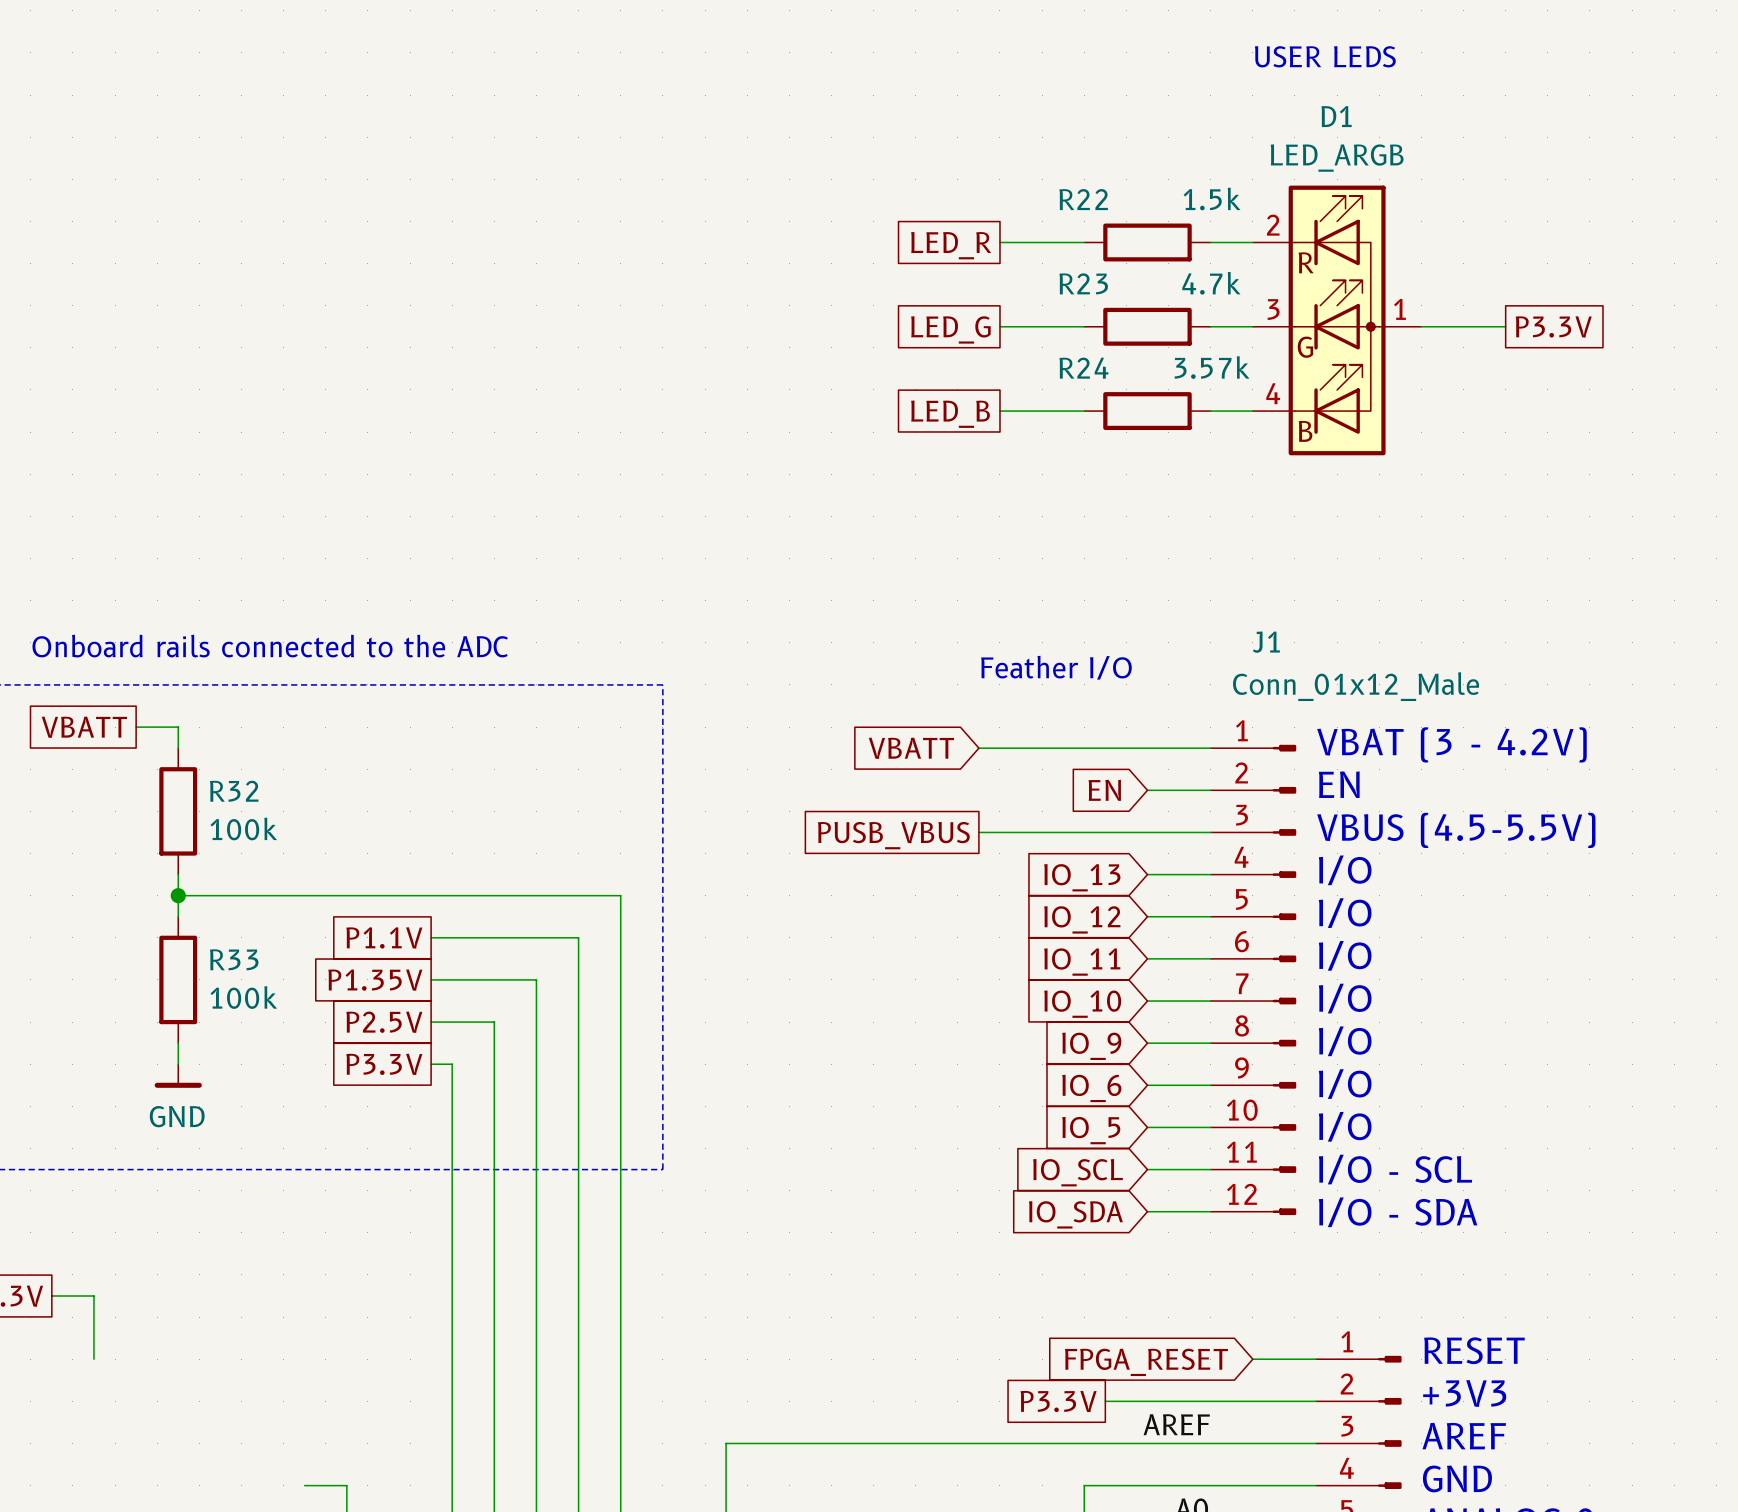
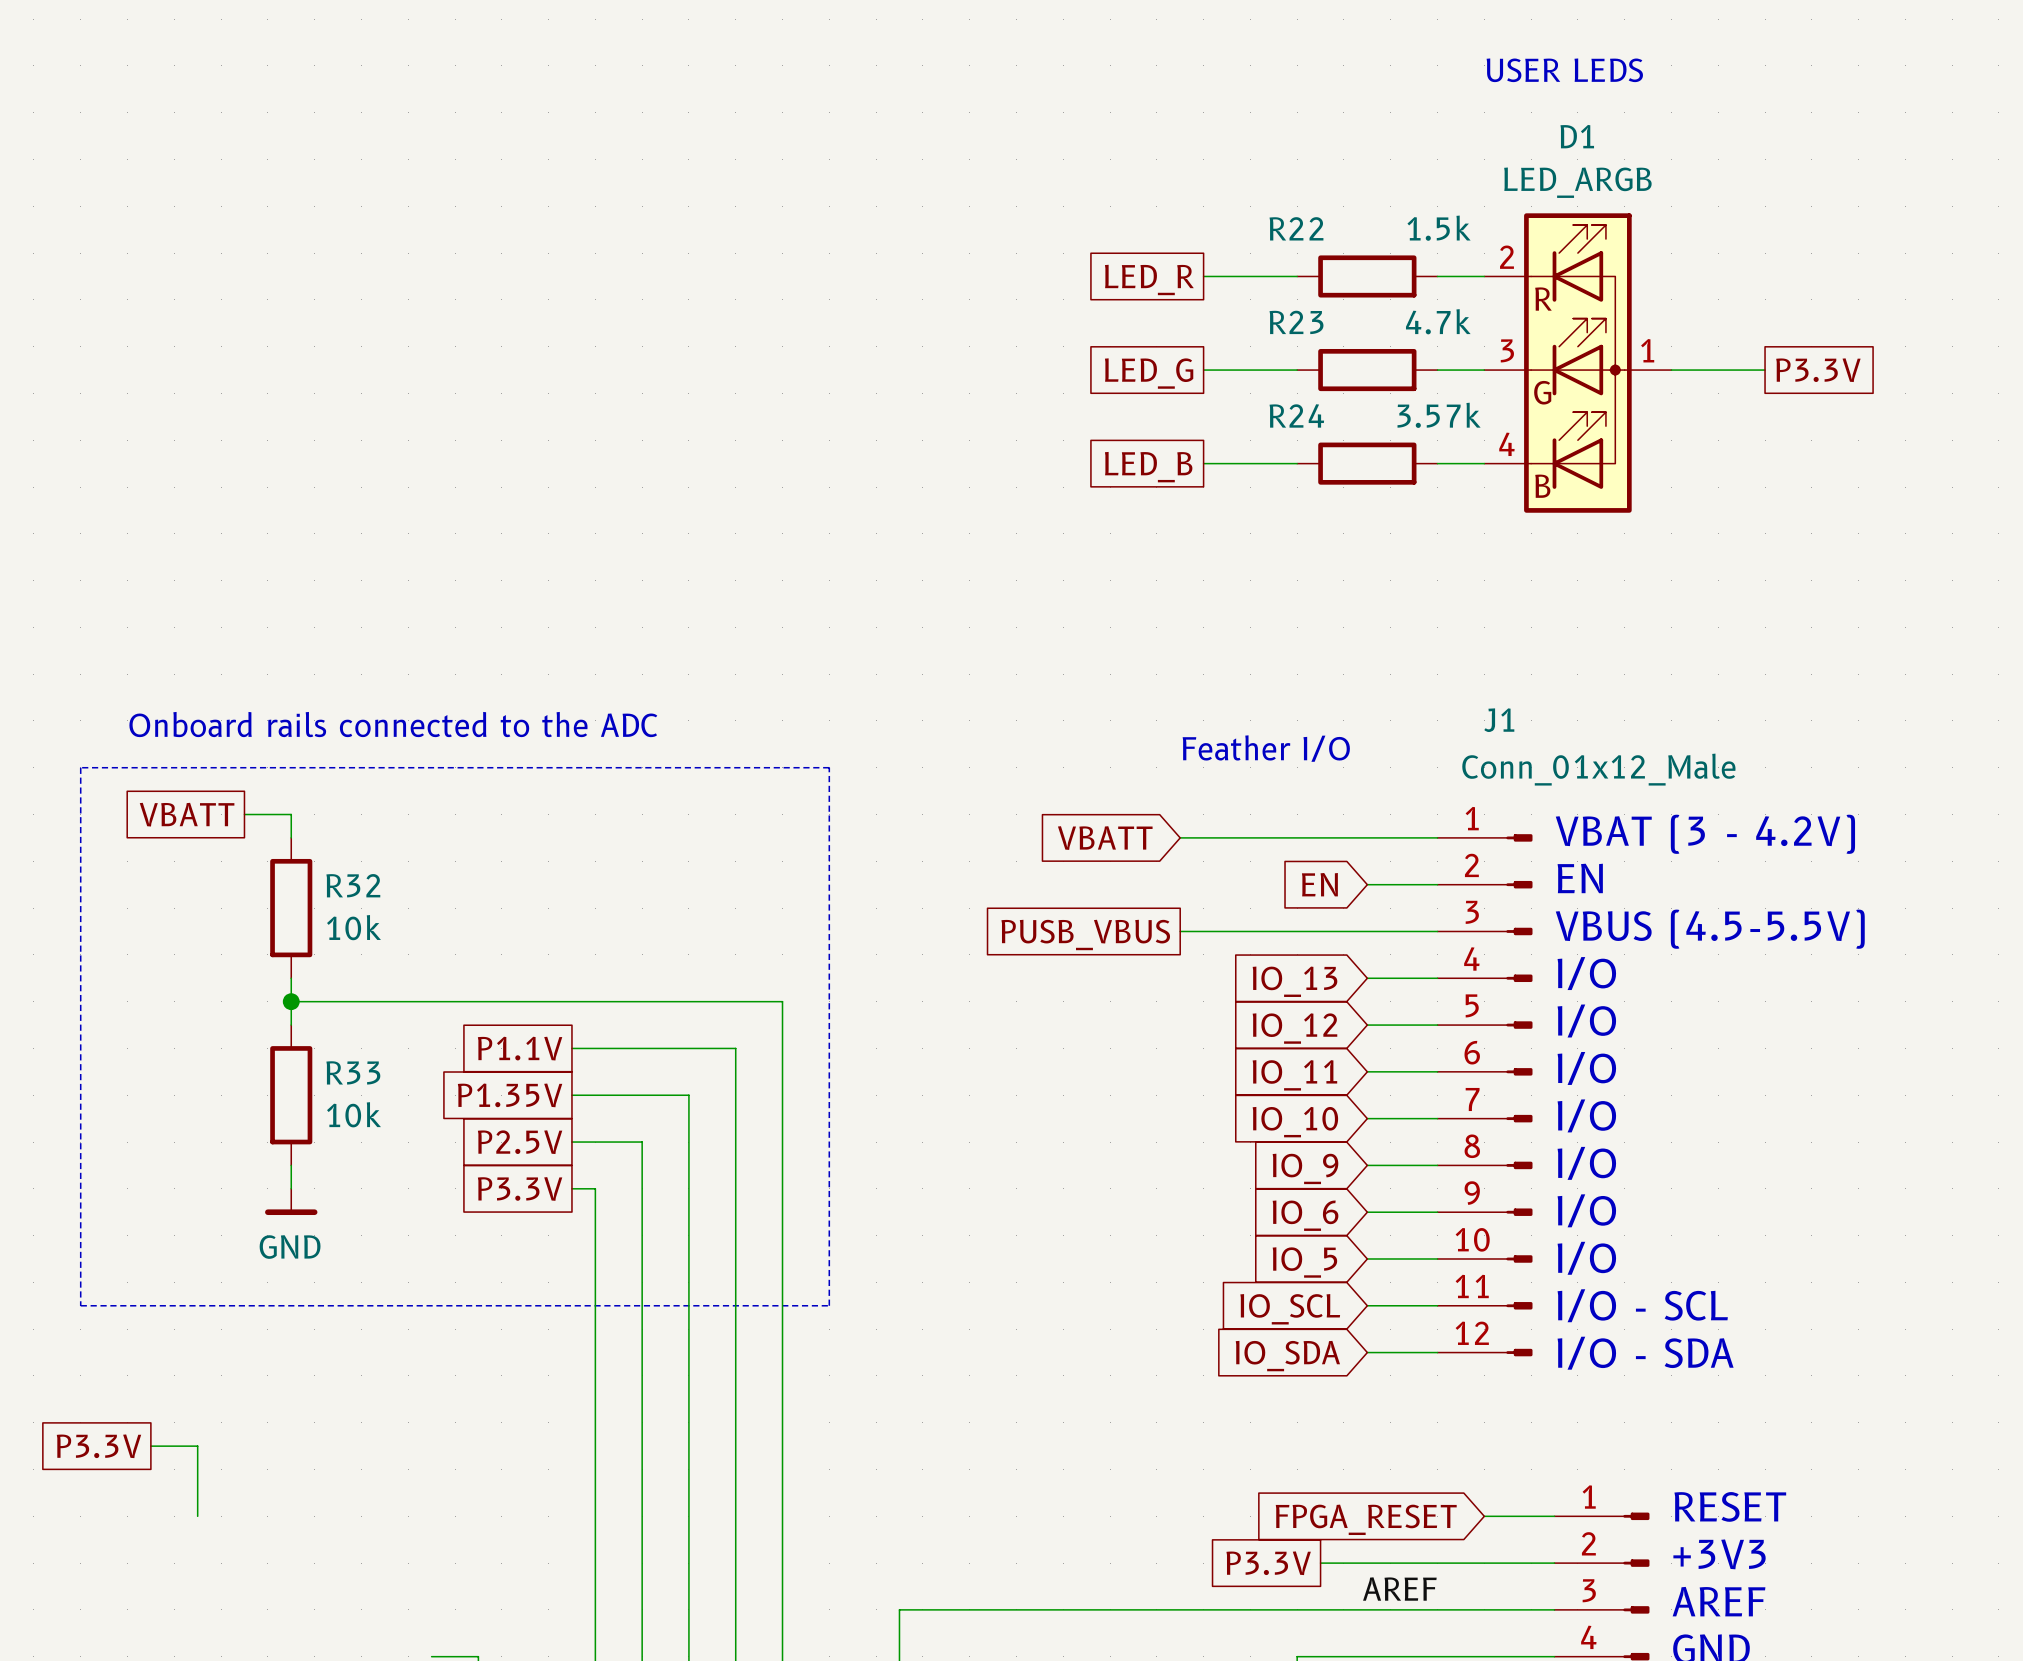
R32 value: 100k (243, 828) -> 10k (353, 927)
R33 value: 100k (243, 997) -> 10k (353, 1114)

